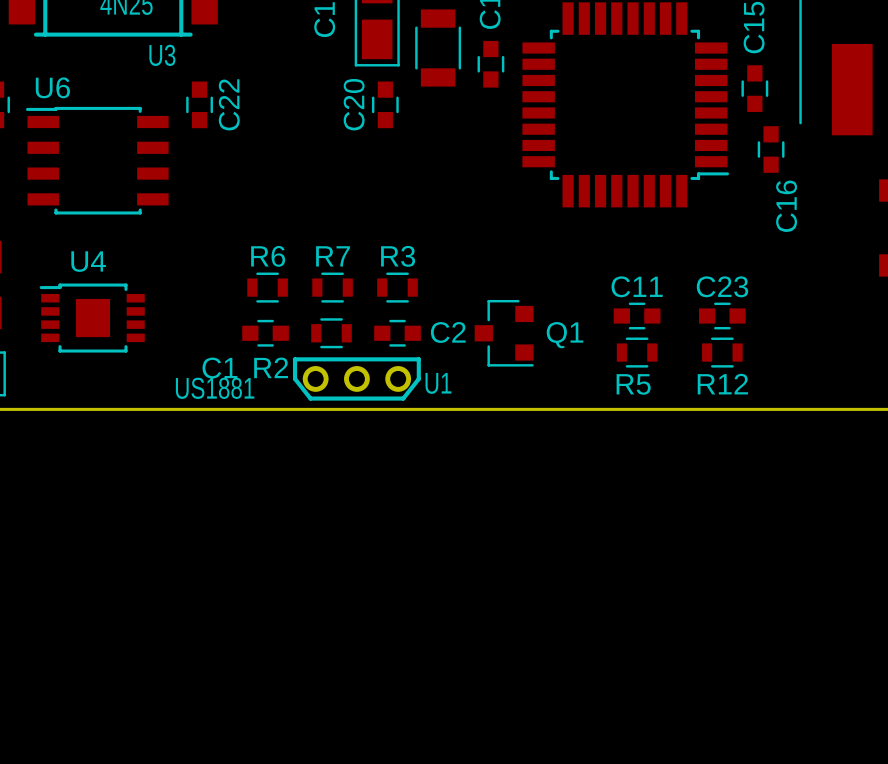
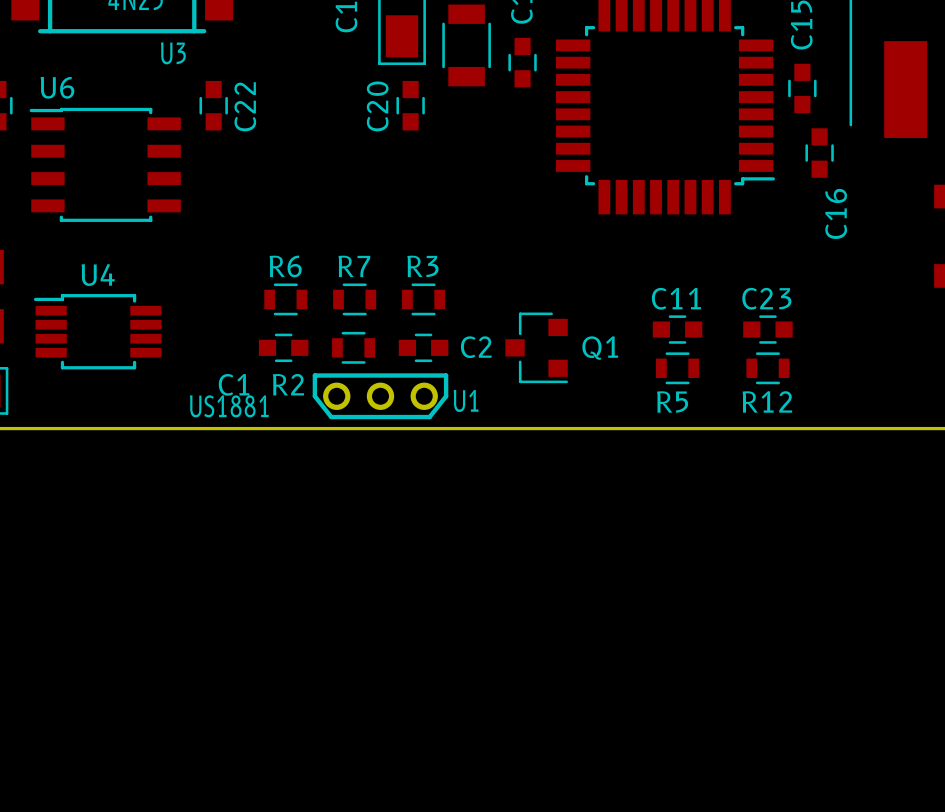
U4 footprint: [39, 283, 145, 353] -> [33, 294, 162, 370]

